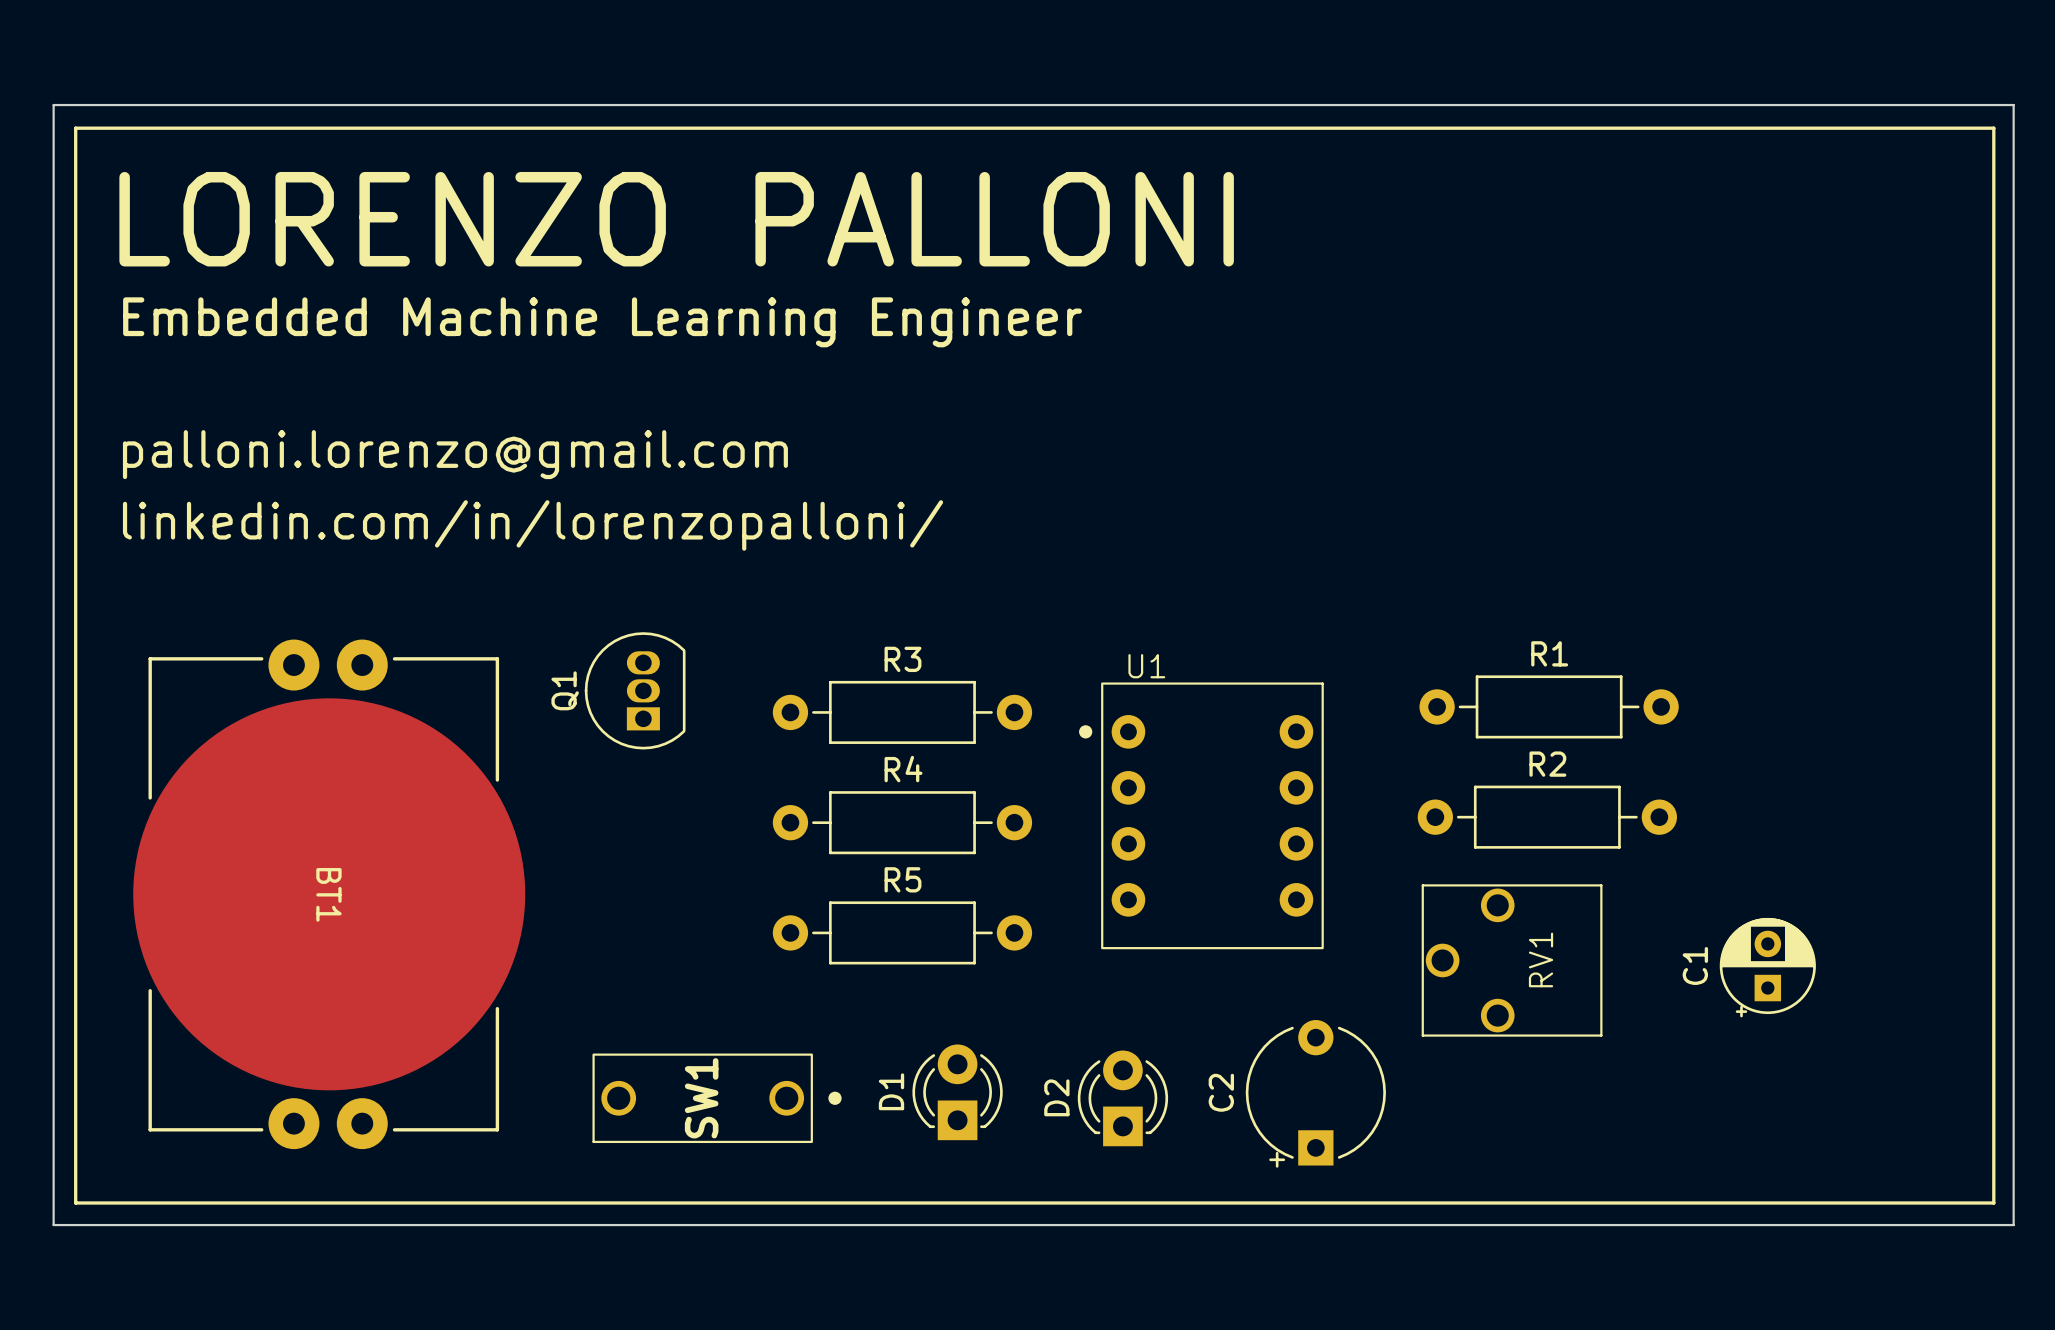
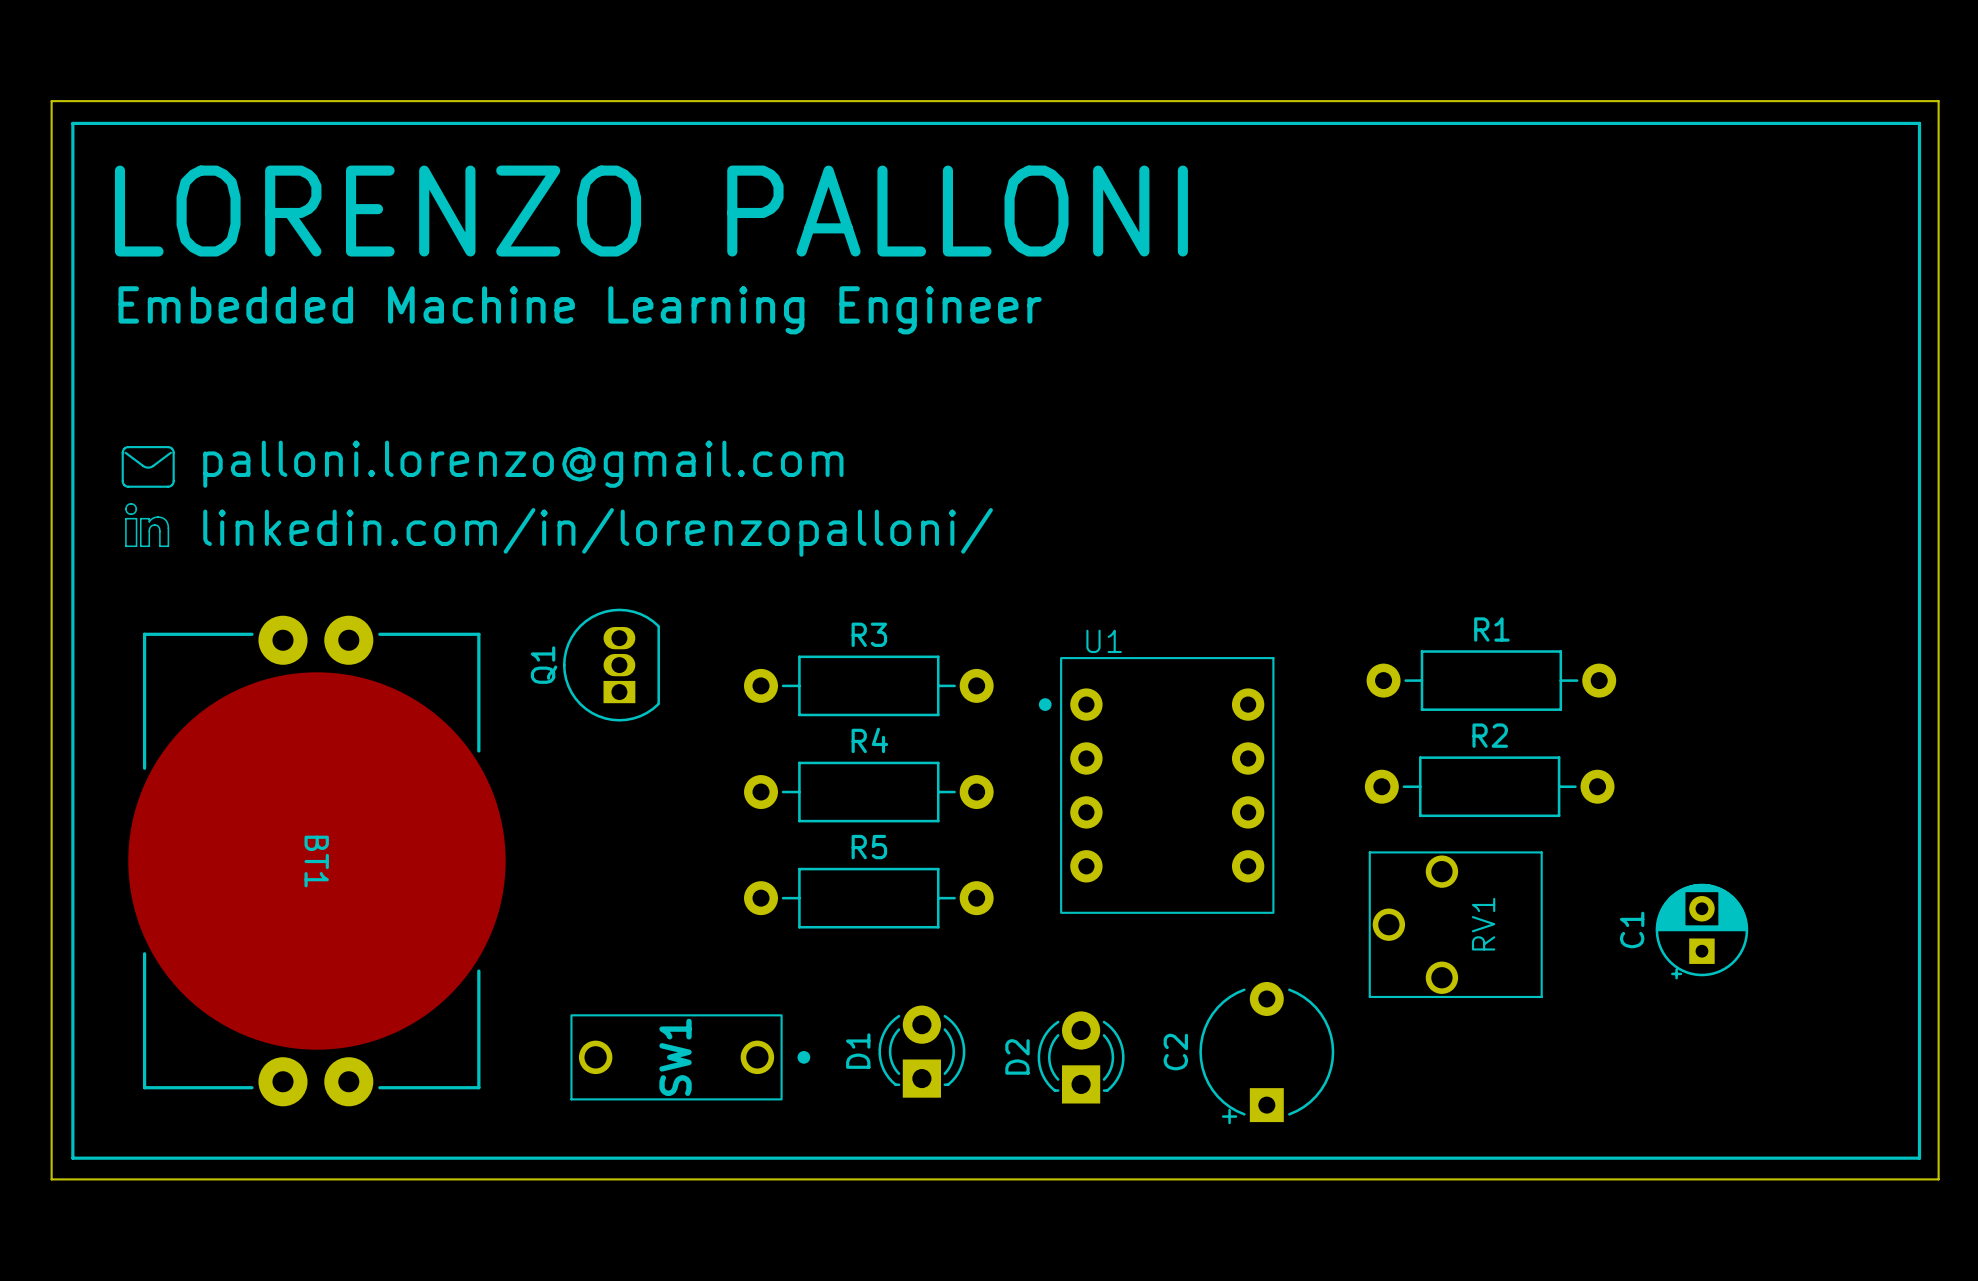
text position: palloni.lorenzo@gmail.com (455, 454) -> palloni.lorenzo@gmail.com (523, 464)
line: none -> (128, 447) (171, 448) (173, 452) (172, 484) (168, 486) (124, 485) (122, 481) (122, 452) (128, 447)
line: none -> (125, 452) (148, 467) (170, 452)
line: none -> (131, 503) (134, 505) (136, 509) (134, 512) (131, 514) (127, 512) (125, 509) (127, 505) (131, 503)
text position: linkedin.com/in/lorenzopalloni/ (533, 525) -> linkedin.com/in/lorenzopalloni/ (598, 532)
line: none -> (157, 517) (149, 521) (149, 518) (140, 518) (140, 546) (149, 546) (149, 529) (154, 525) (159, 528) (159, 546) (168, 546) (167, 523) (163, 518) (157, 517)
line: none -> (125, 518) (125, 546) (136, 546) (136, 518) (125, 518)

